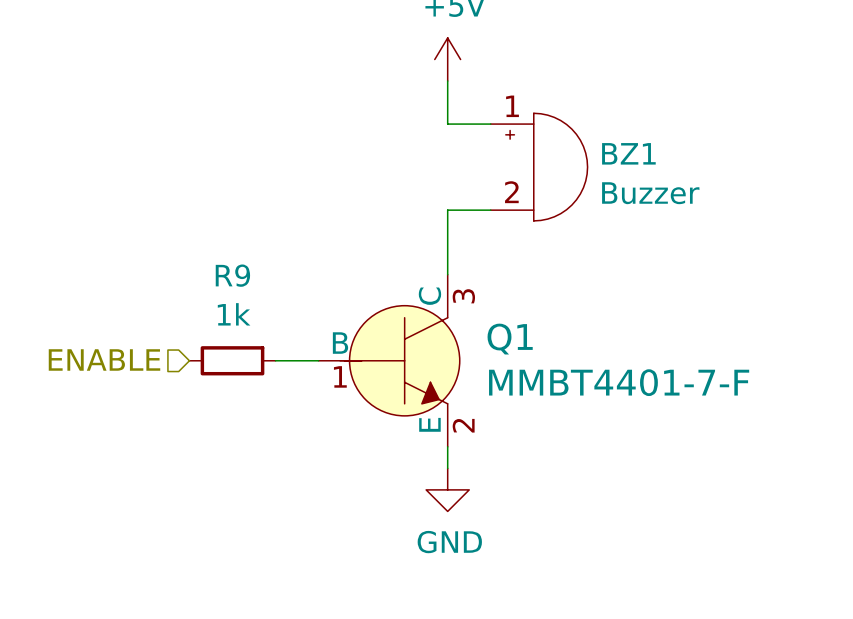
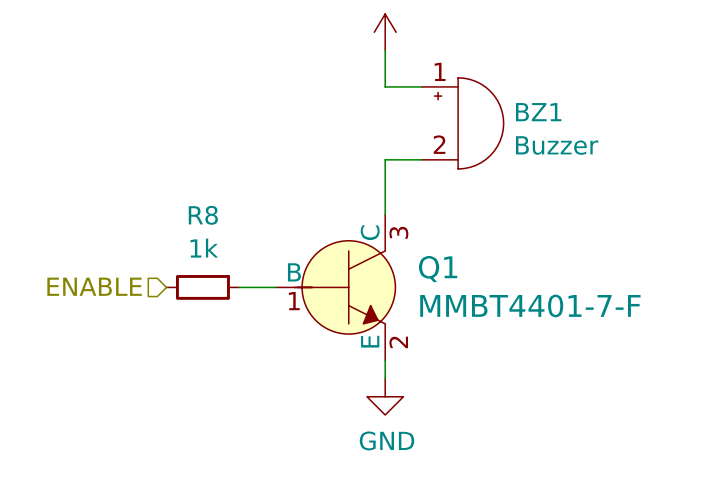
R9 name: R9 (232, 275) -> R8 (203, 215)

